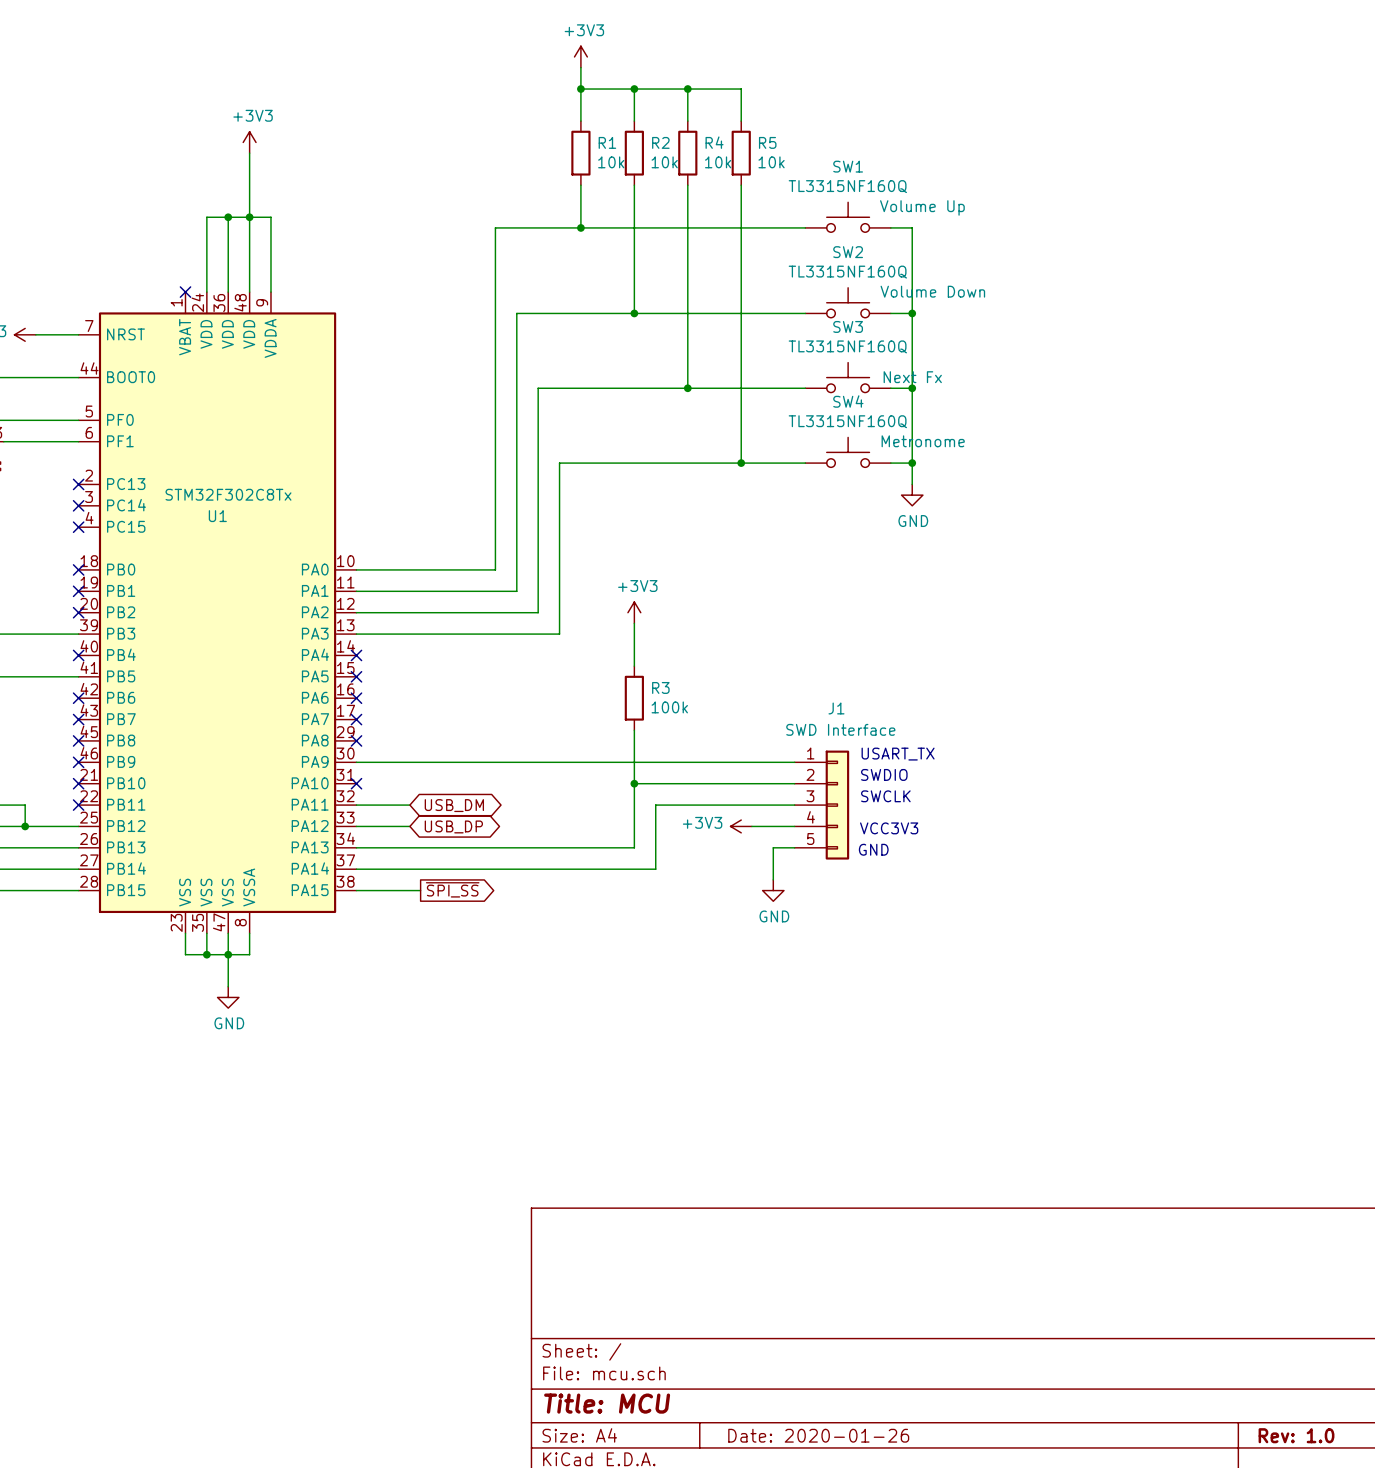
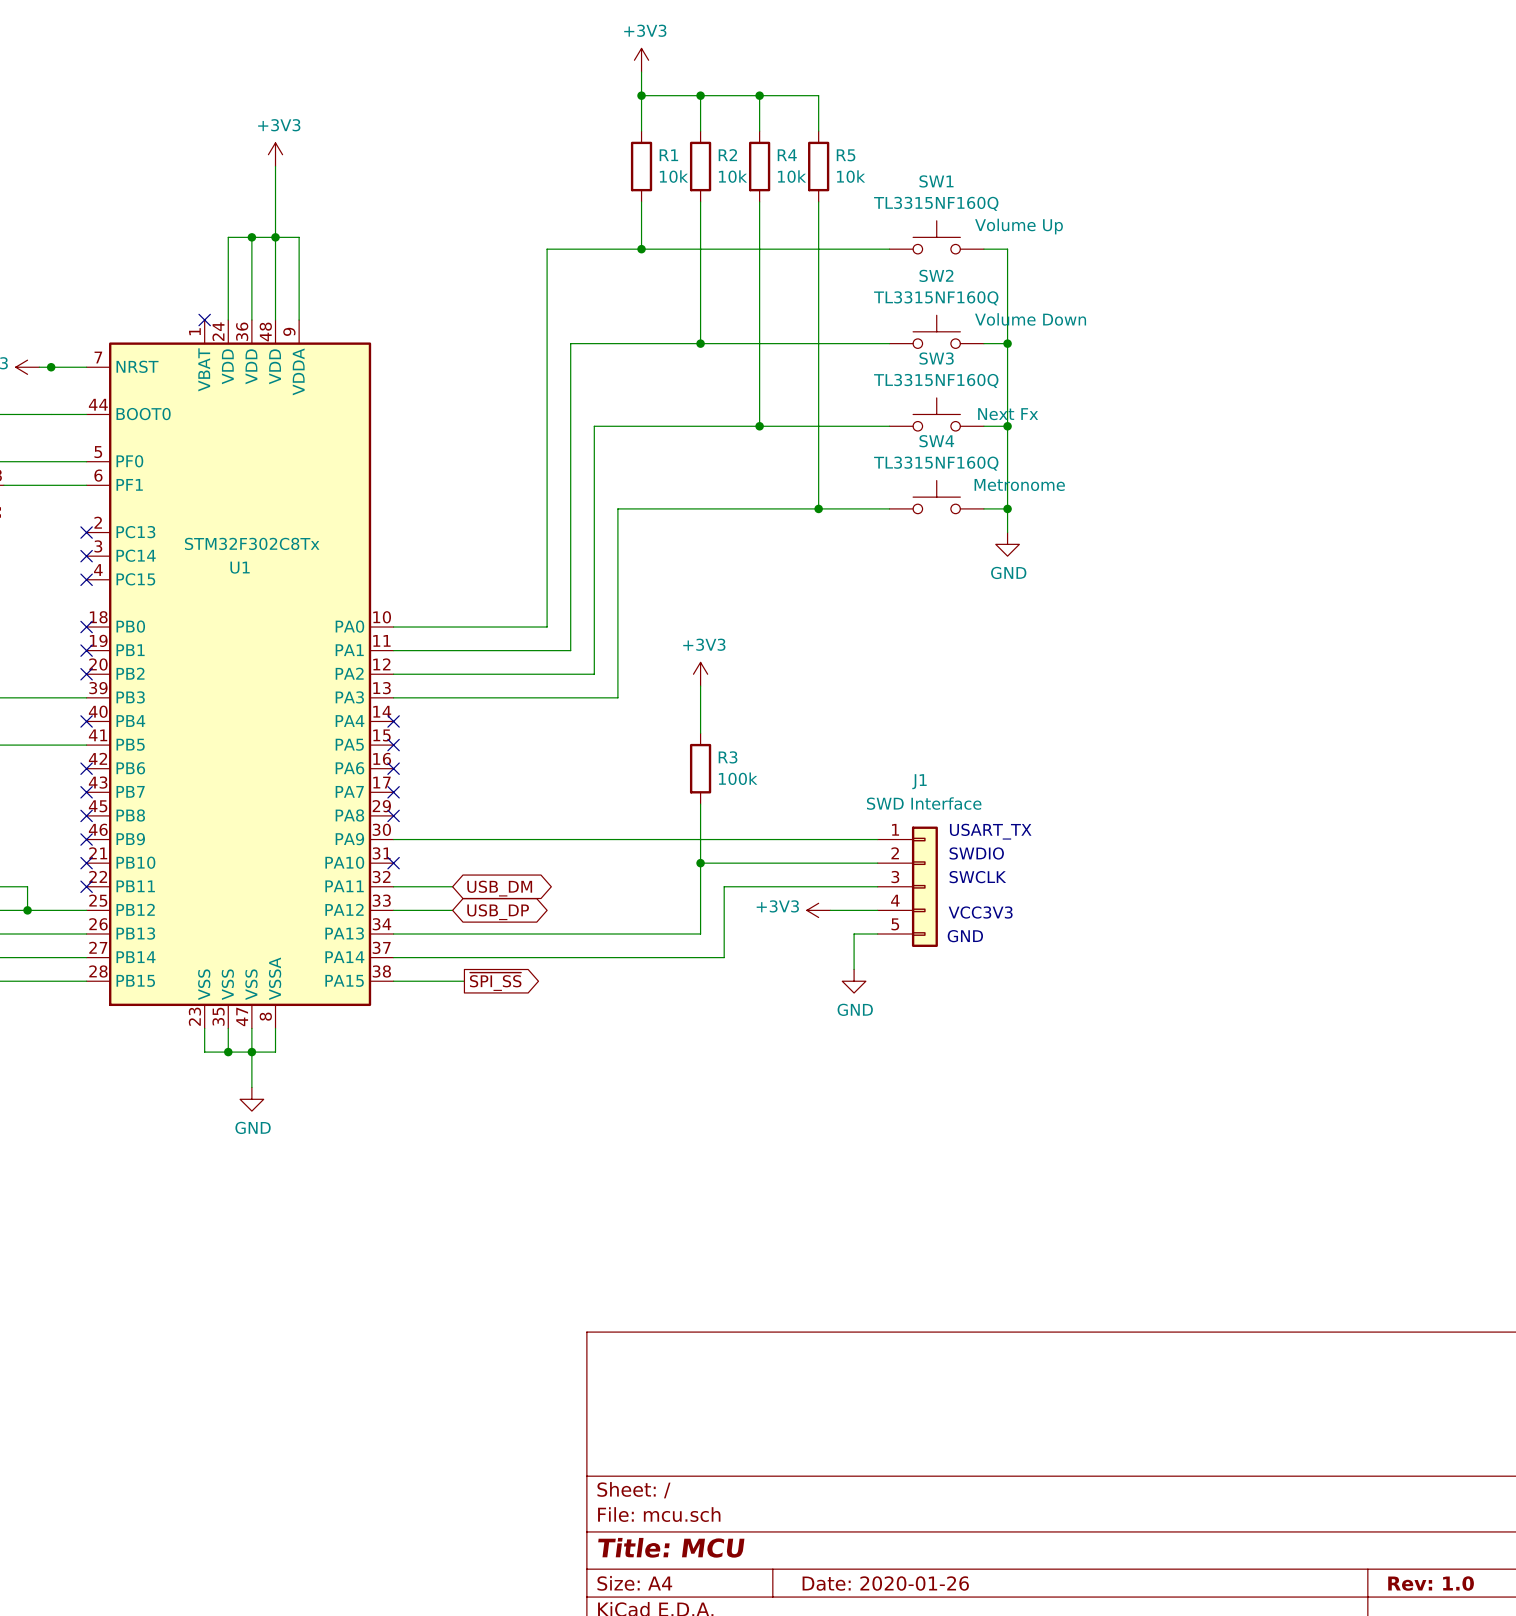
junction: none -> (51, 367)

